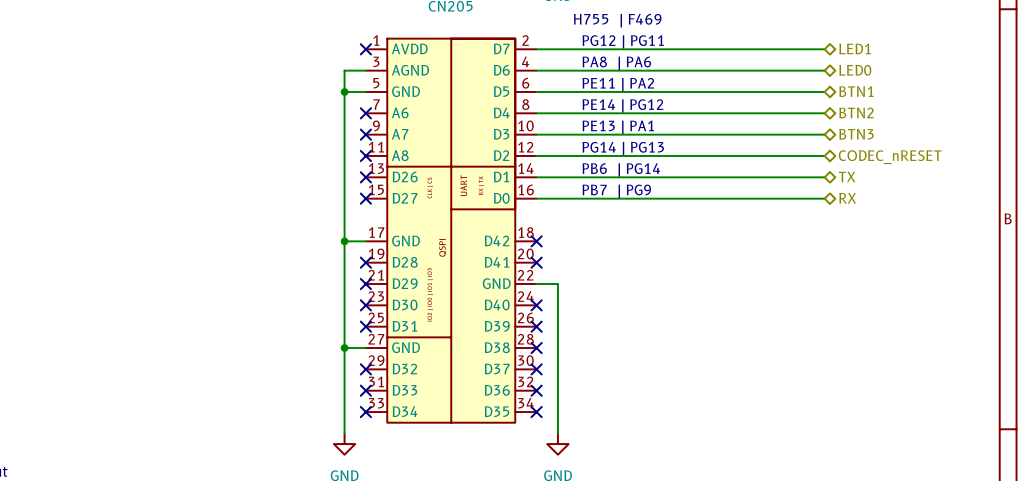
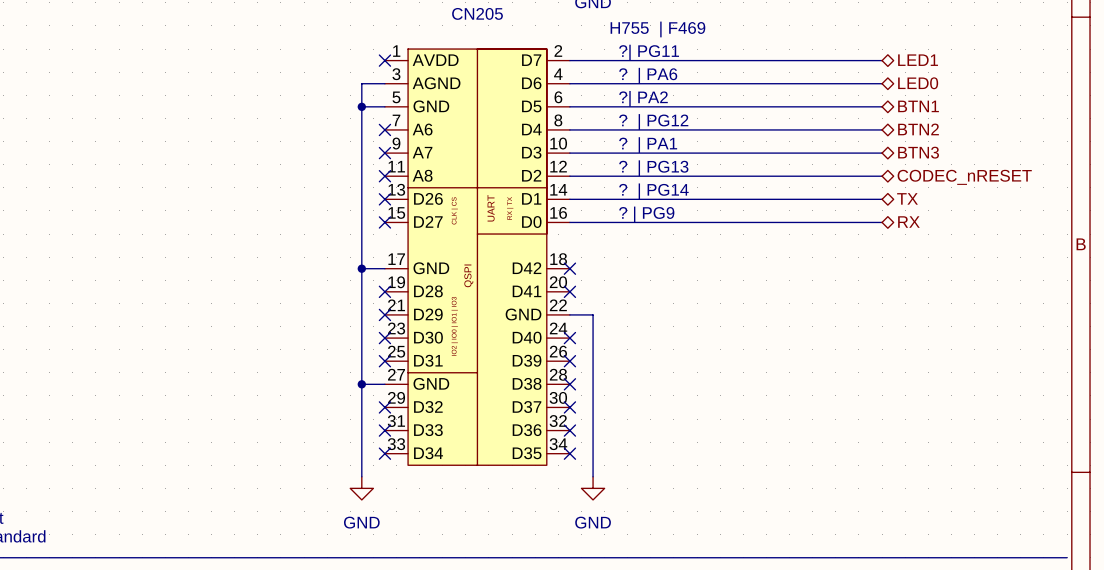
text: PG12 | PG11 (623, 41) -> ?| PG11 (649, 52)
text: PA8 | PA6 (616, 63) -> ? | PA6 (648, 75)
text: PE11 | PA2 (618, 84) -> ?| PA2 (643, 98)
text: PE14 | PG12 (622, 105) -> ? | PG12 (653, 121)
text: PE13 | PA1 (618, 127) -> ? | PA1 (648, 145)
text: PG14 | PG13 (623, 148) -> ? | PG13 (653, 168)
text: PB6 | PG14 (621, 169) -> ? | PG14 (653, 191)
text: PB7 | PG9 (616, 191) -> ? | PG9 (646, 214)

